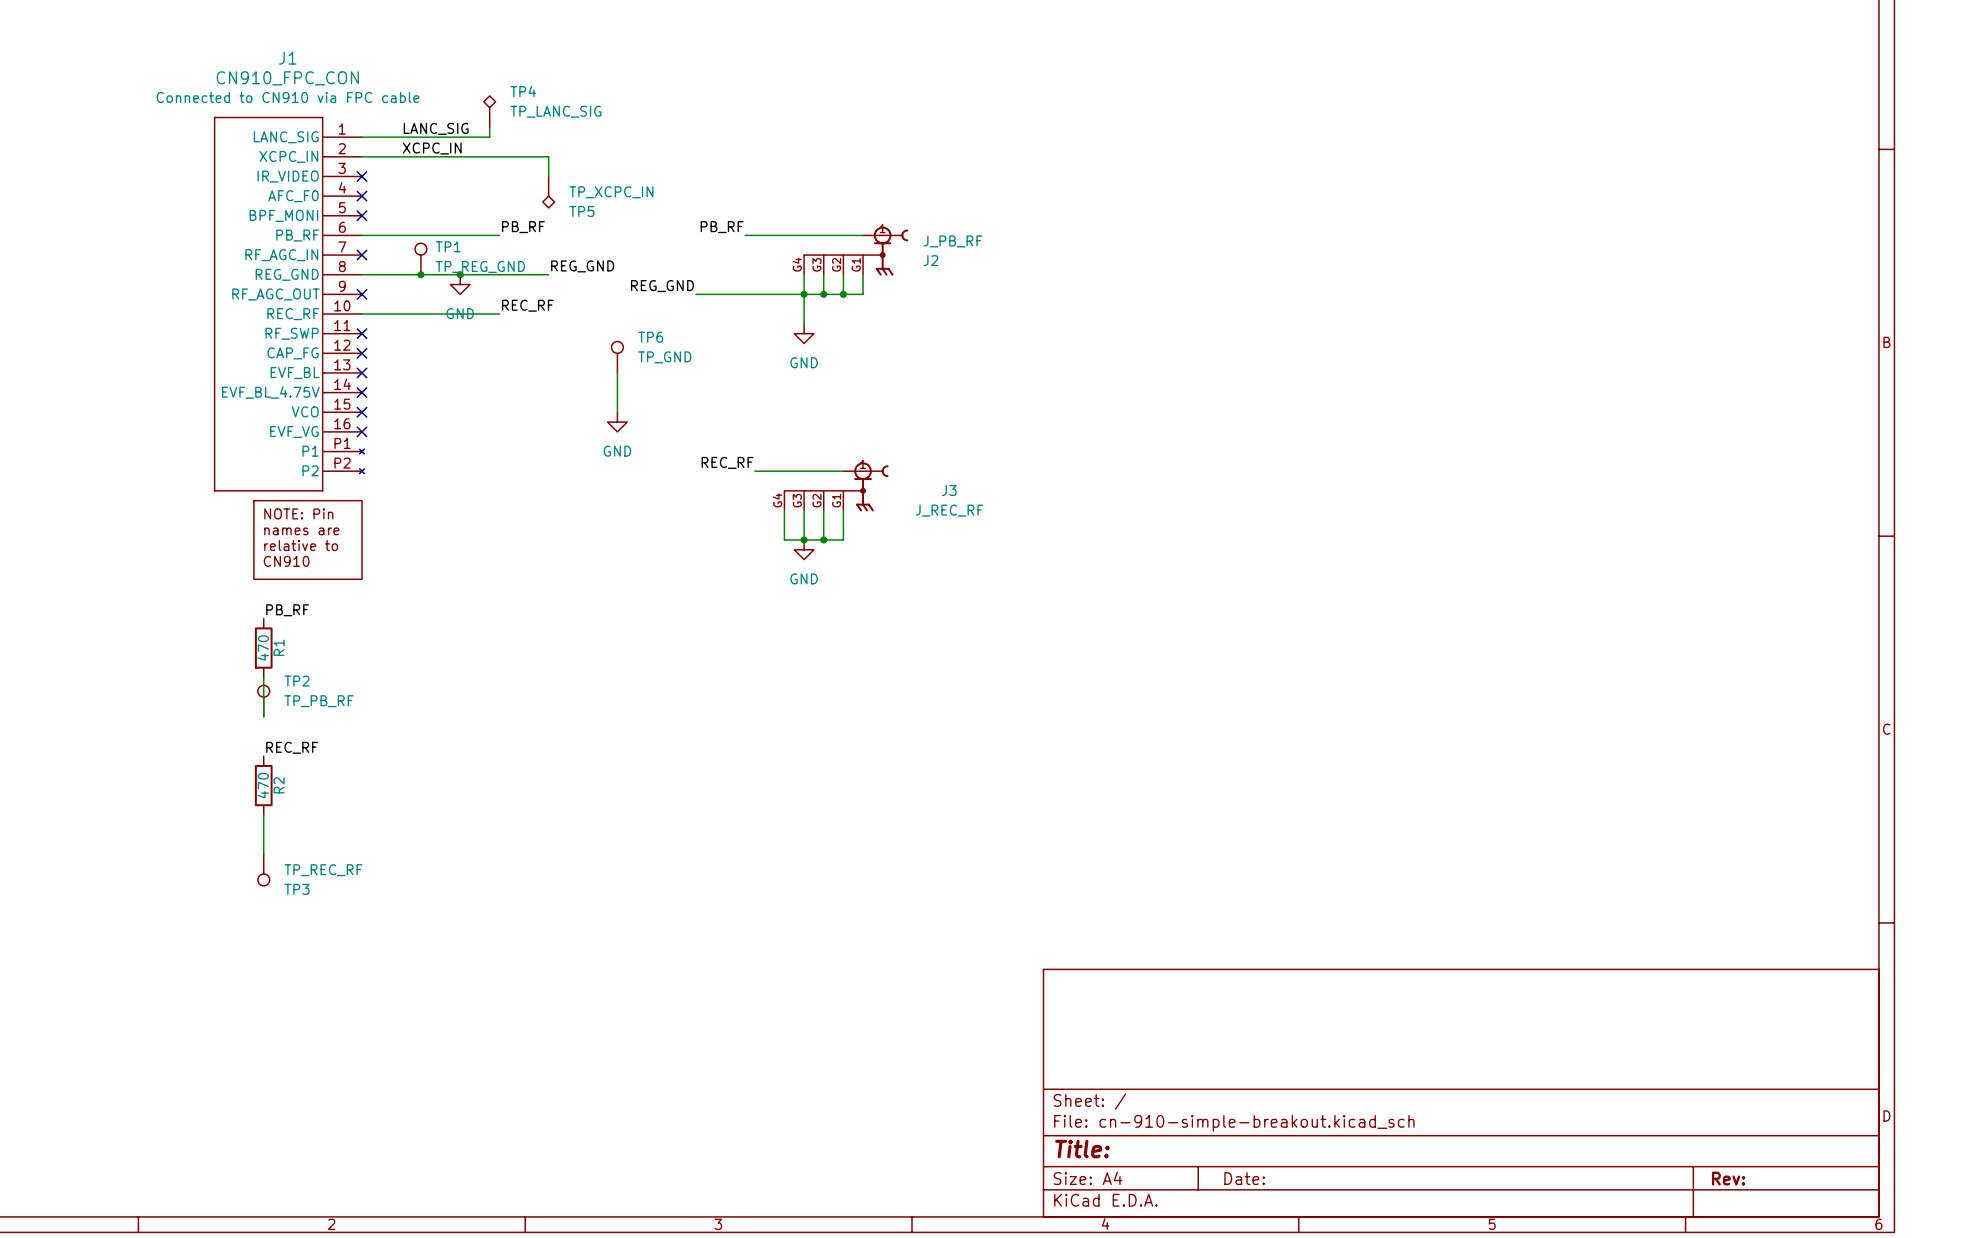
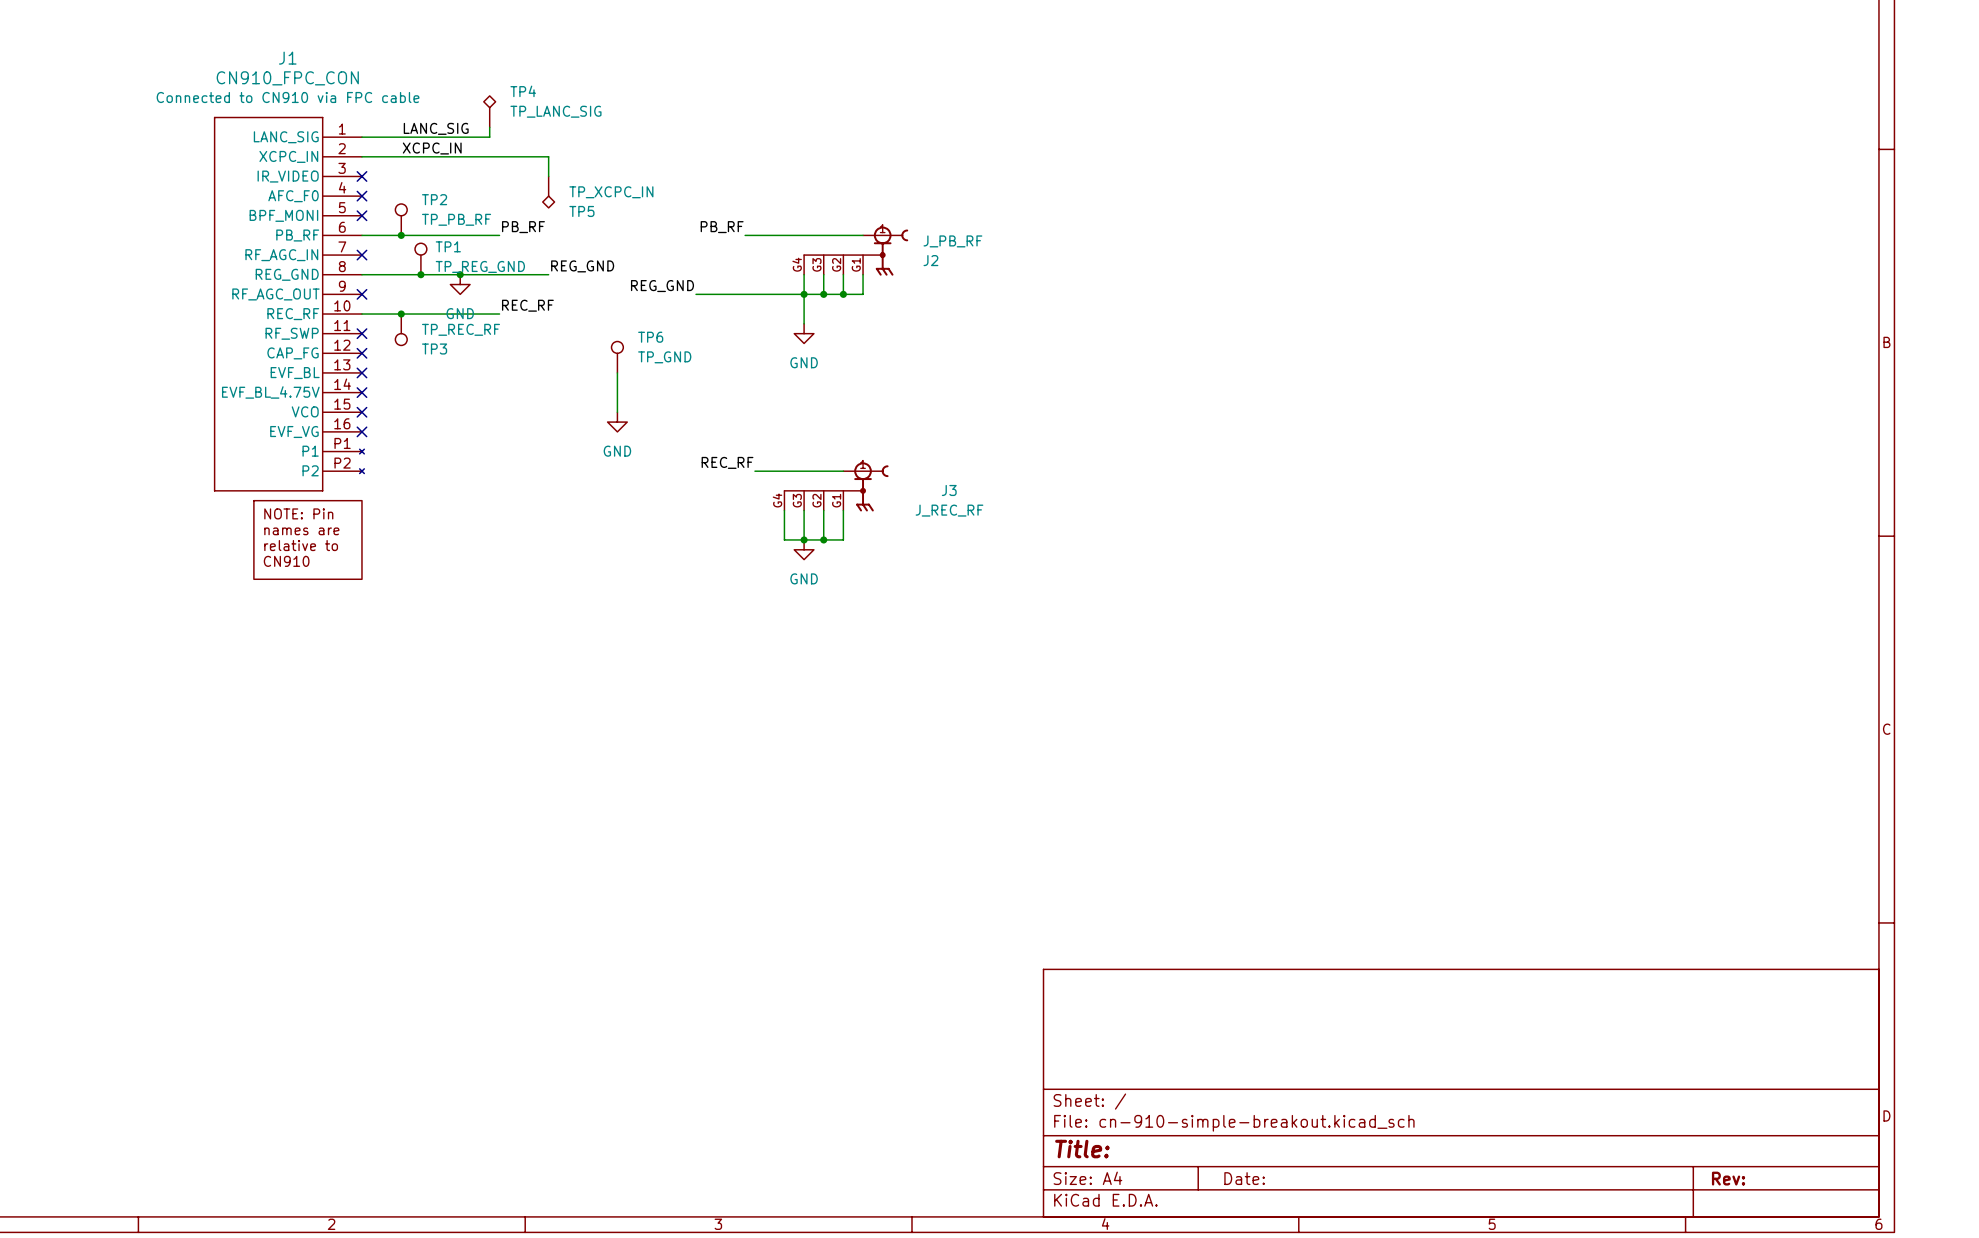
junction: none -> (401, 235)
junction: none -> (401, 314)
label: PB_RF (287, 610) -> none
R1: 470 (263, 648) -> none
wire: (263, 677) (263, 716) -> none
TP2 position: (263, 701) -> (401, 219)
label: REC_RF (292, 747) -> none
R2: 470 (263, 785) -> none
wire: (263, 815) (263, 854) -> none
TP3 position: (263, 870) -> (401, 329)

